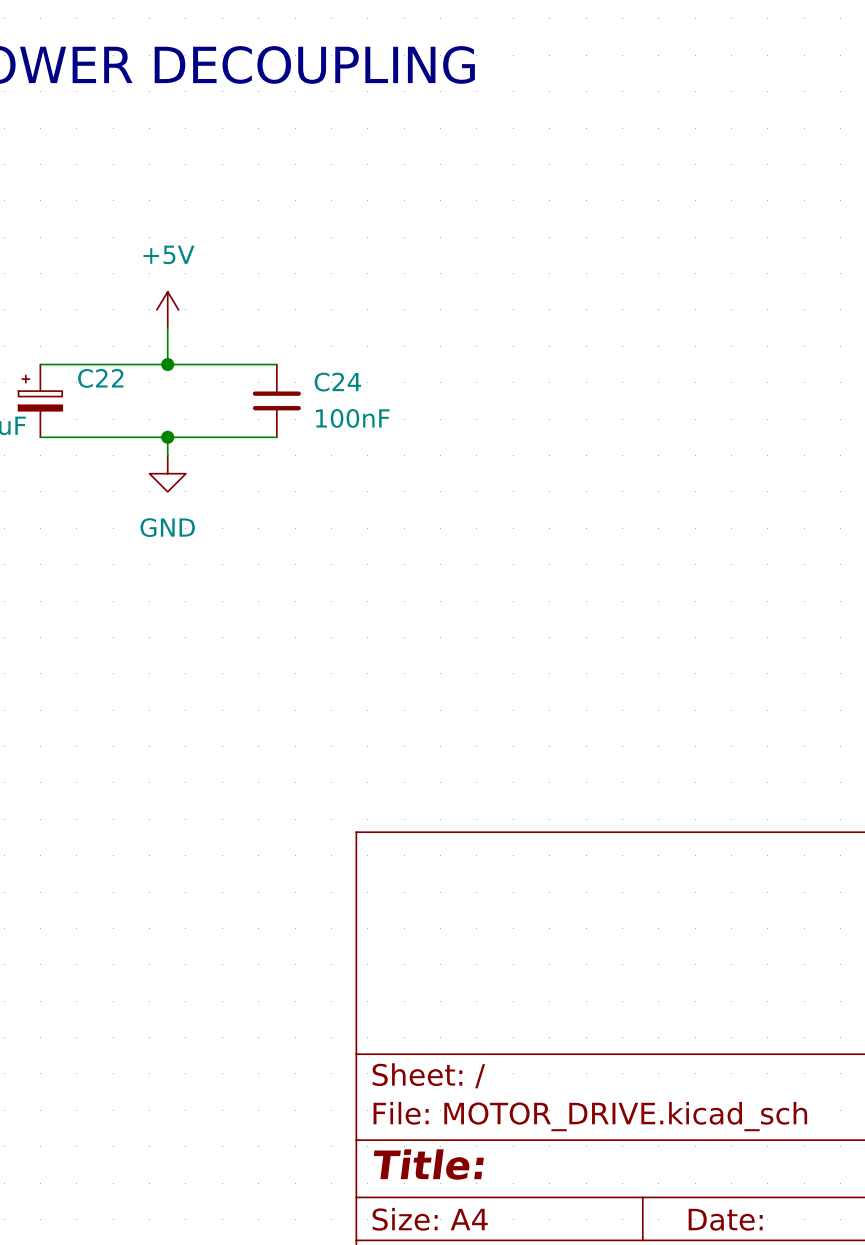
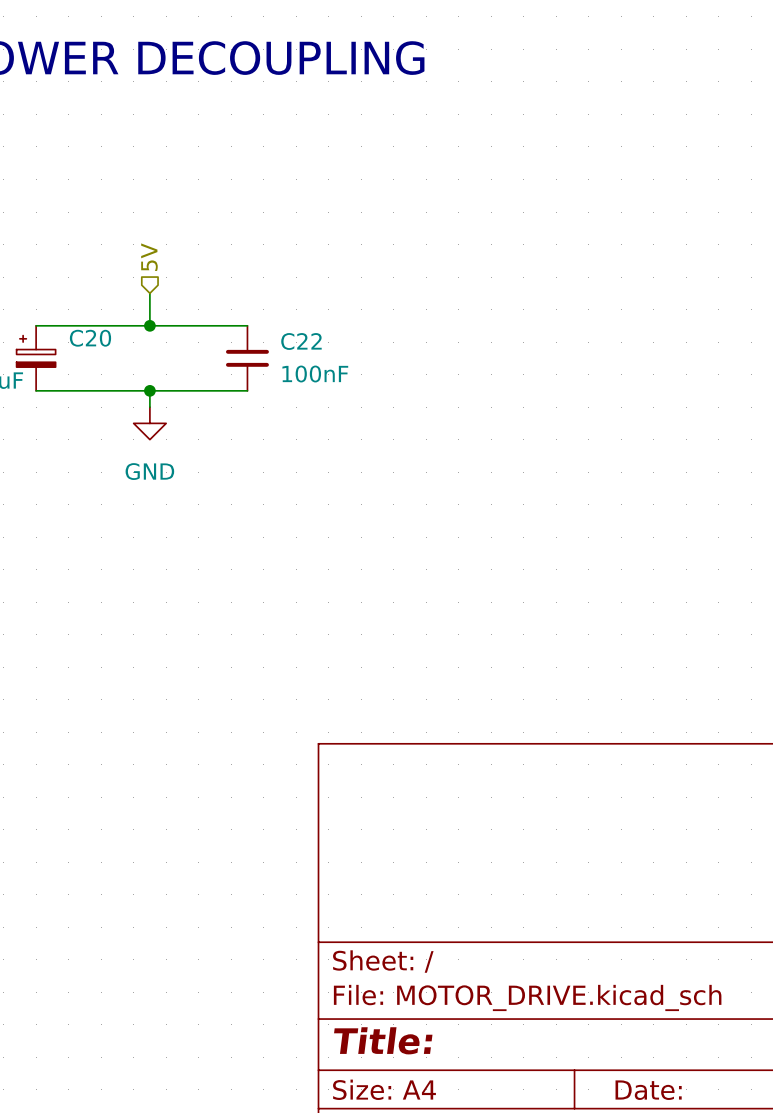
hierarchical label: none -> 5V (149, 257)
power symbol: +5V (167, 309) -> none
C22 name: C22 (100, 378) -> C20 (90, 338)
C24 name: C24 (337, 382) -> C22 (301, 341)

